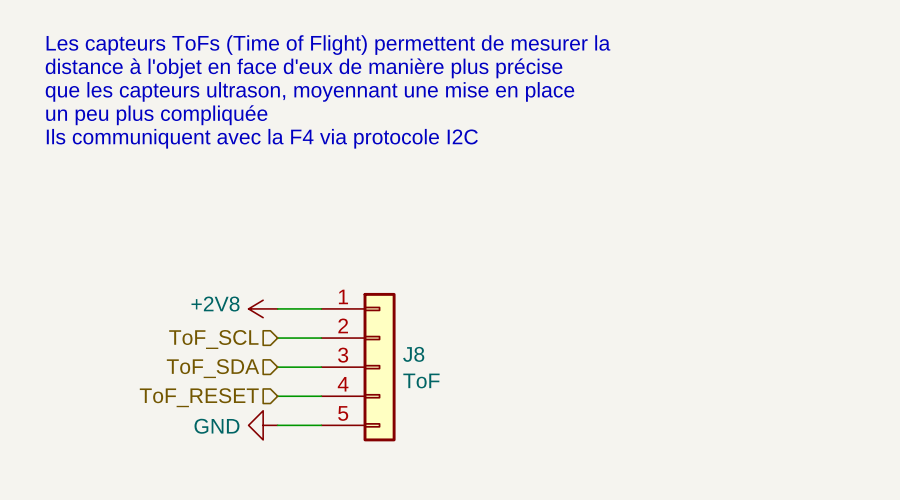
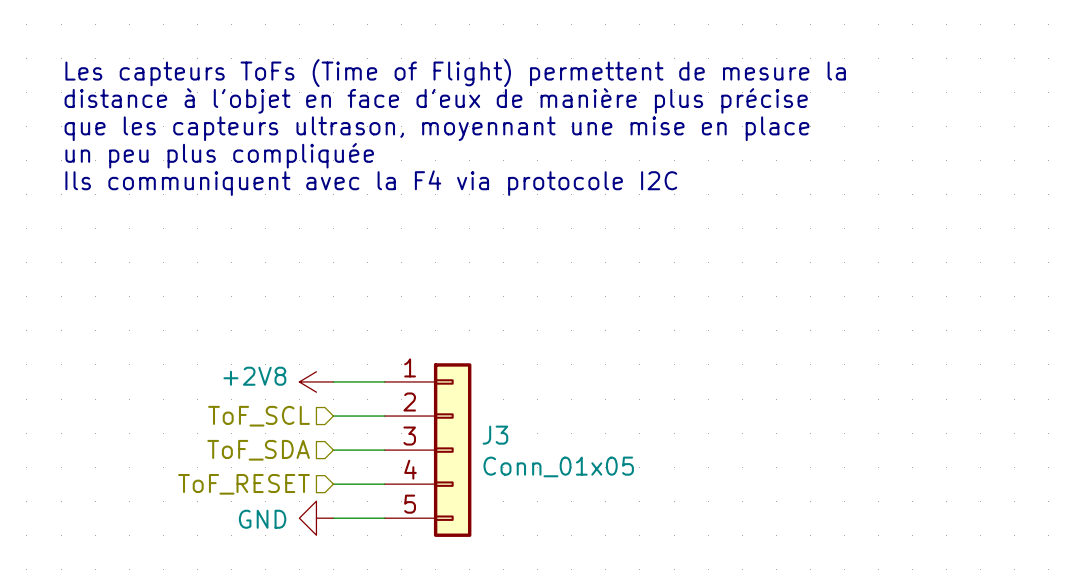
text: Les capteurs ToFs (Time of Flight) permettent de mesurer la (328, 45) -> Les capteurs ToFs (Time of Flight) permettent de mesure la (455, 73)
J8 name: J8 (413, 354) -> J3 (495, 435)
J8 value: ToF (421, 380) -> Conn_01x05 (558, 466)

